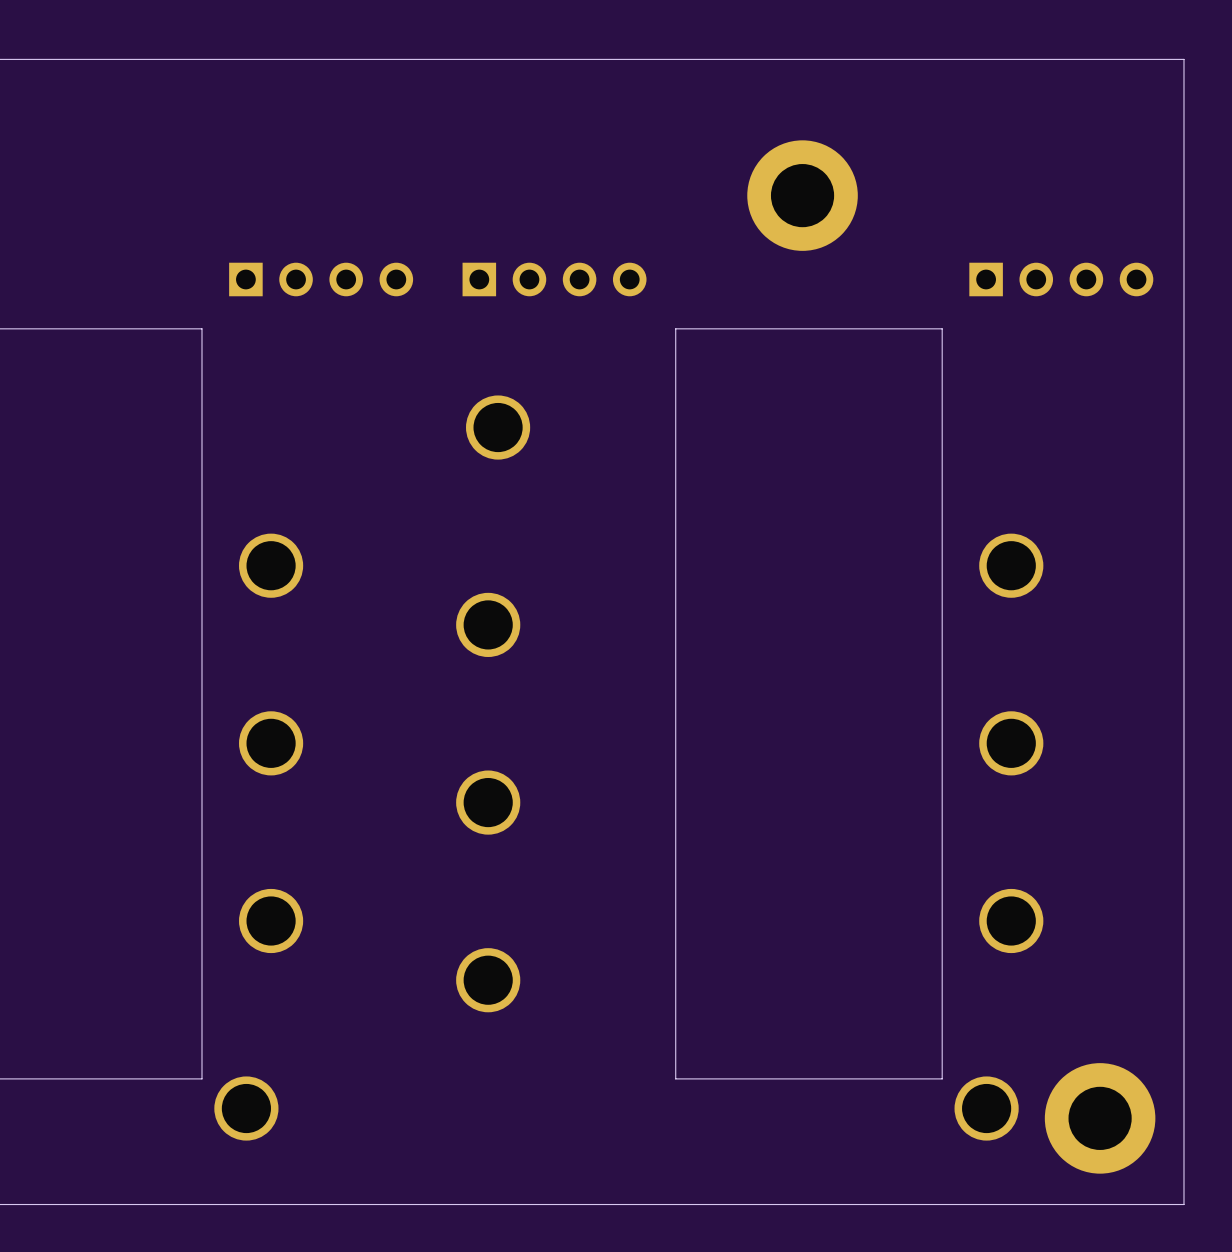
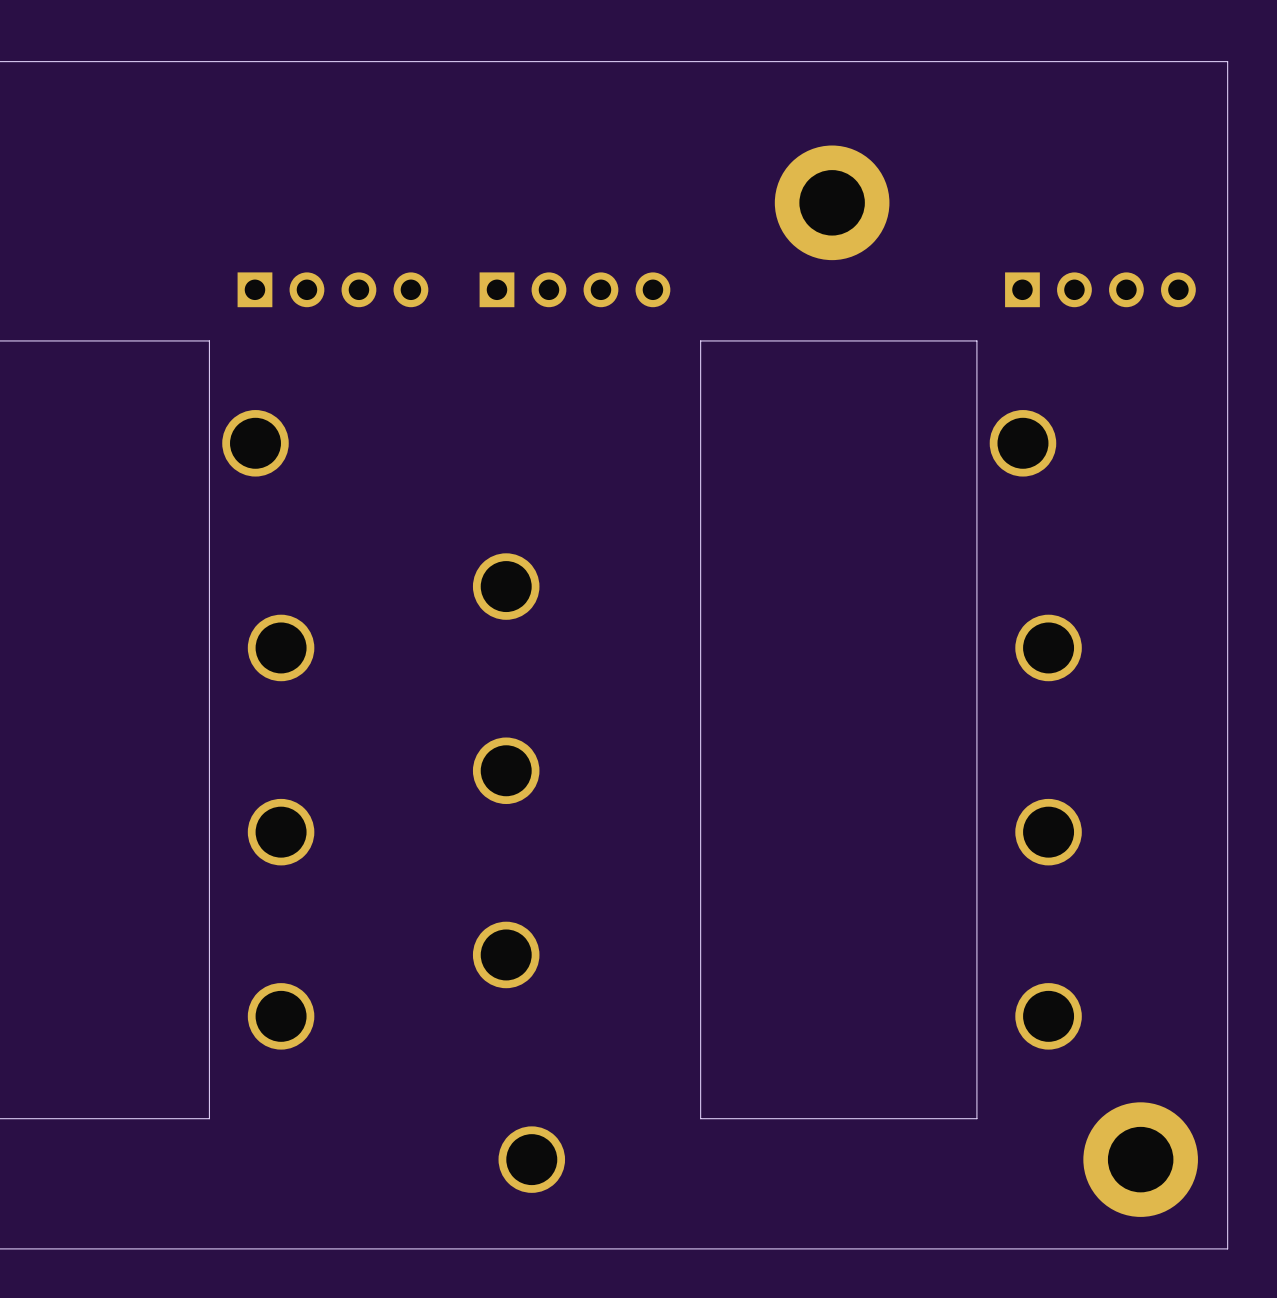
part: none -> (255, 443)
part: (498, 427) -> none
part: none -> (1022, 443)
part: (271, 565) -> none
part: none -> (506, 586)
part: (1011, 565) -> none
part: none -> (281, 647)
part: (488, 624) -> none
part: none -> (1048, 647)
part: (271, 743) -> none
part: none -> (506, 770)
part: (1011, 743) -> none
part: none -> (281, 832)
part: (488, 802) -> none
part: none -> (1048, 832)
part: (271, 921) -> none
part: none -> (506, 954)
part: (1011, 921) -> none
part: none -> (281, 1016)
part: (488, 980) -> none
part: none -> (1048, 1016)
part: (246, 1108) -> none
part: (986, 1108) -> none
part: none -> (531, 1159)

